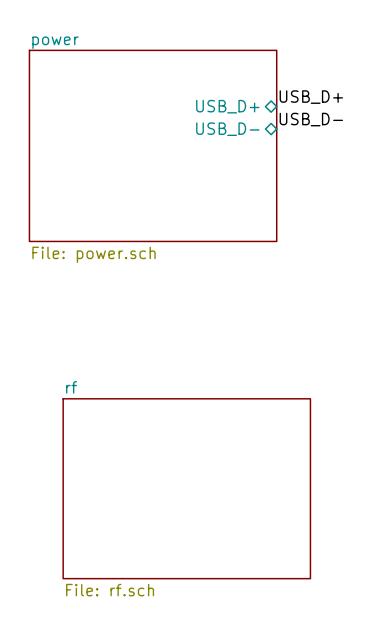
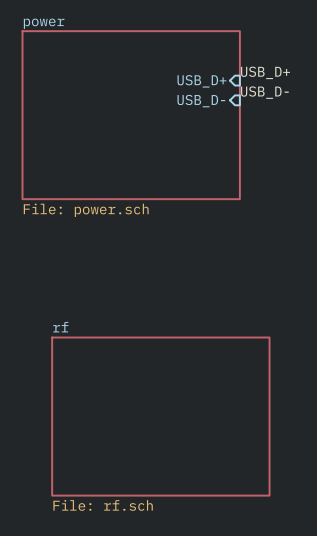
sheet pin shape: bidirectional (227, 106) -> input (201, 81)
sheet pin shape: bidirectional (227, 129) -> input (201, 101)

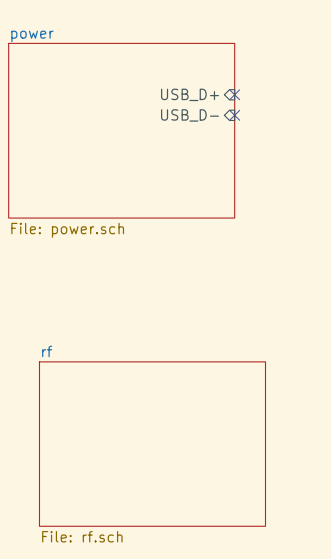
label: USB_D+ (265, 72) -> none
no-connect mark: none -> (234, 94)
label: USB_D- (264, 92) -> none
no-connect mark: none -> (234, 115)

